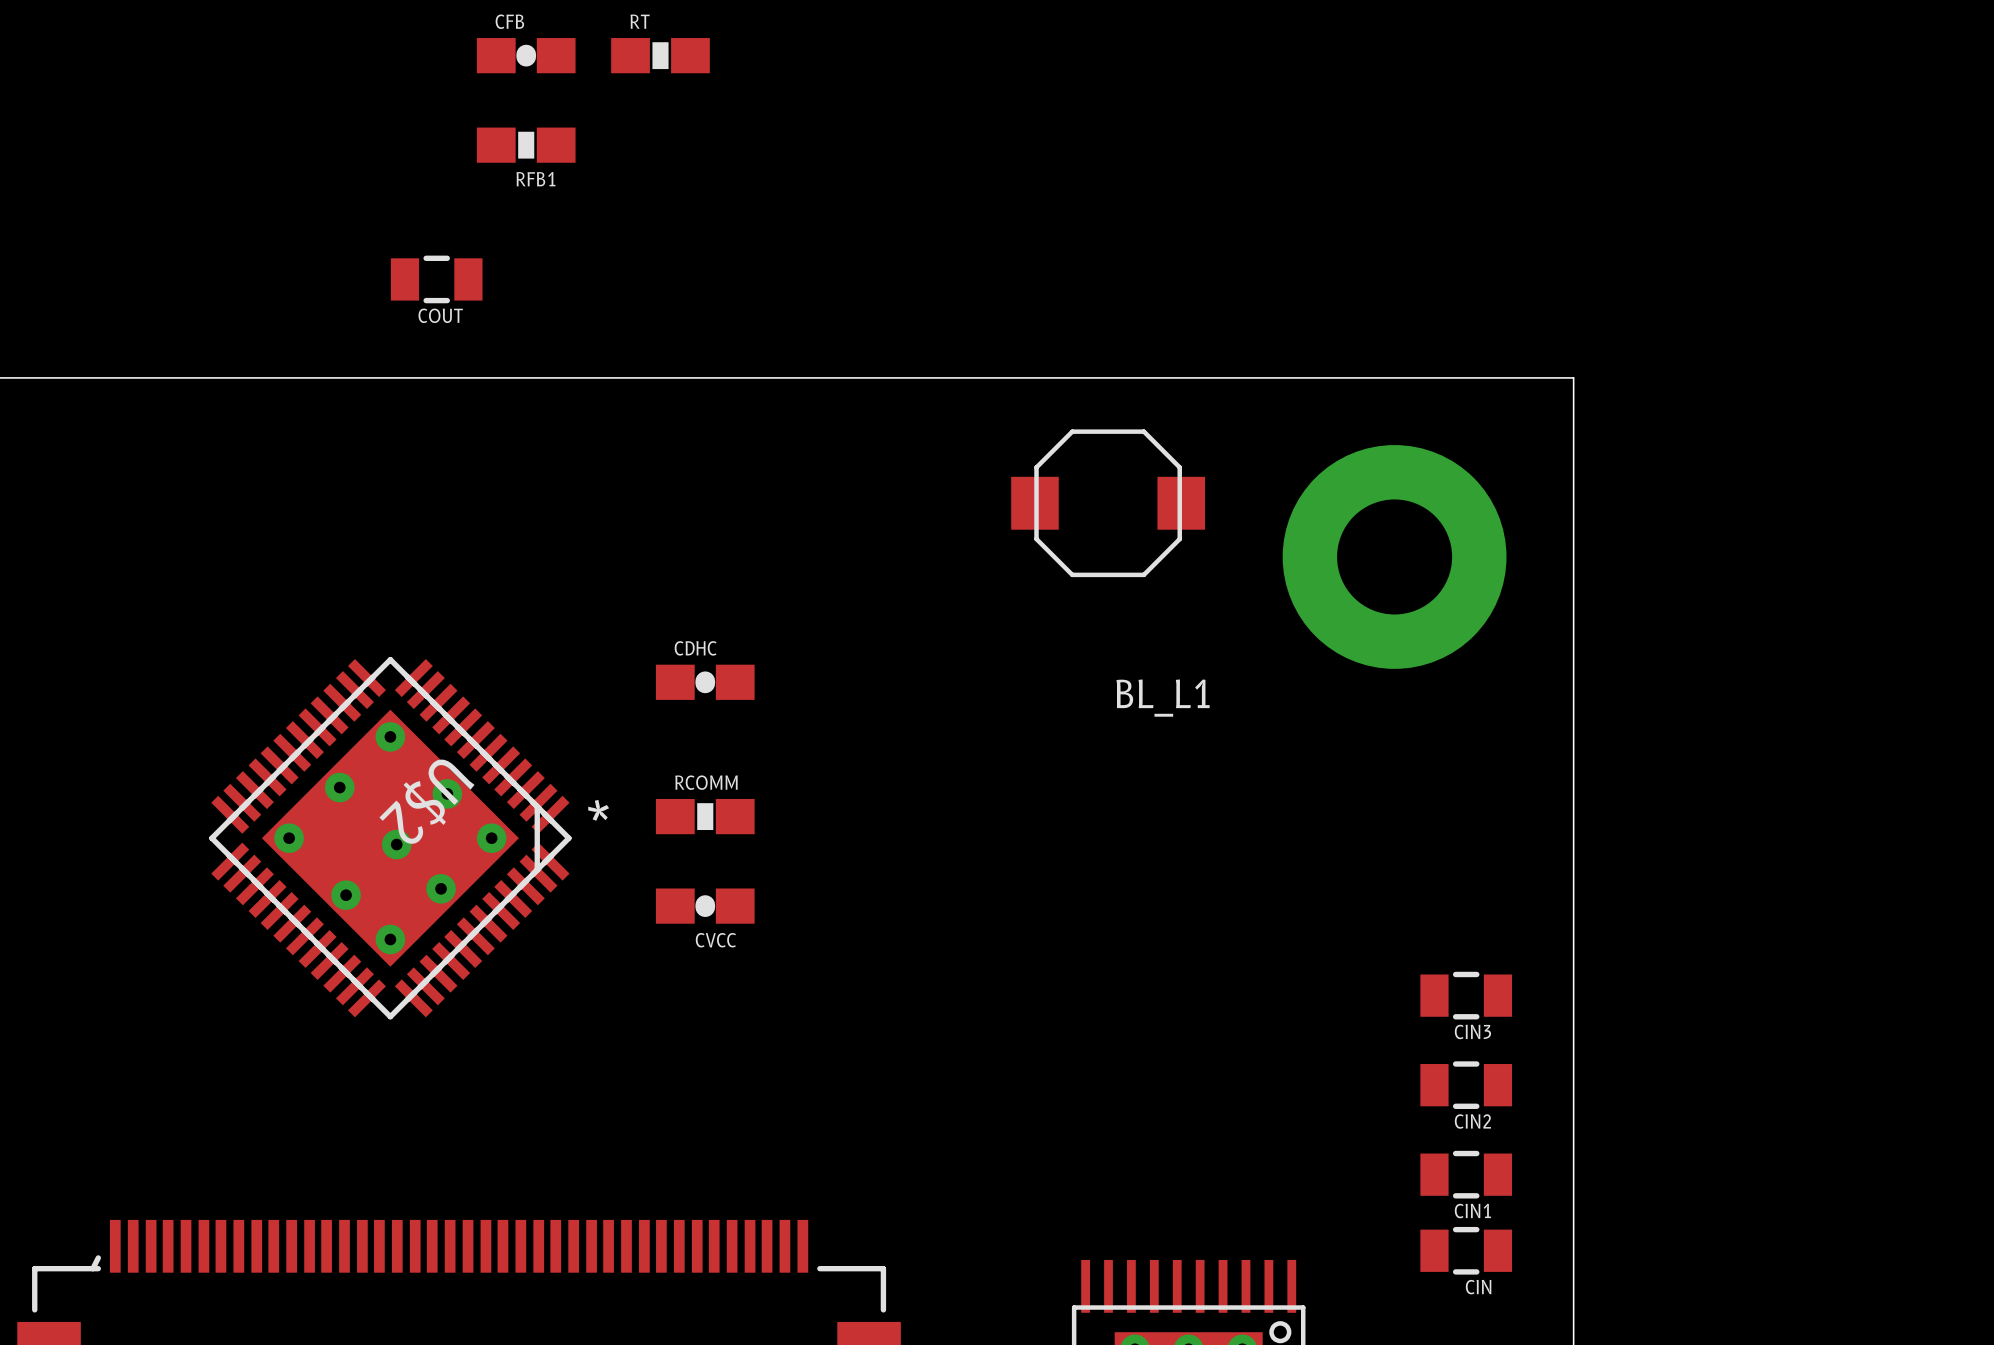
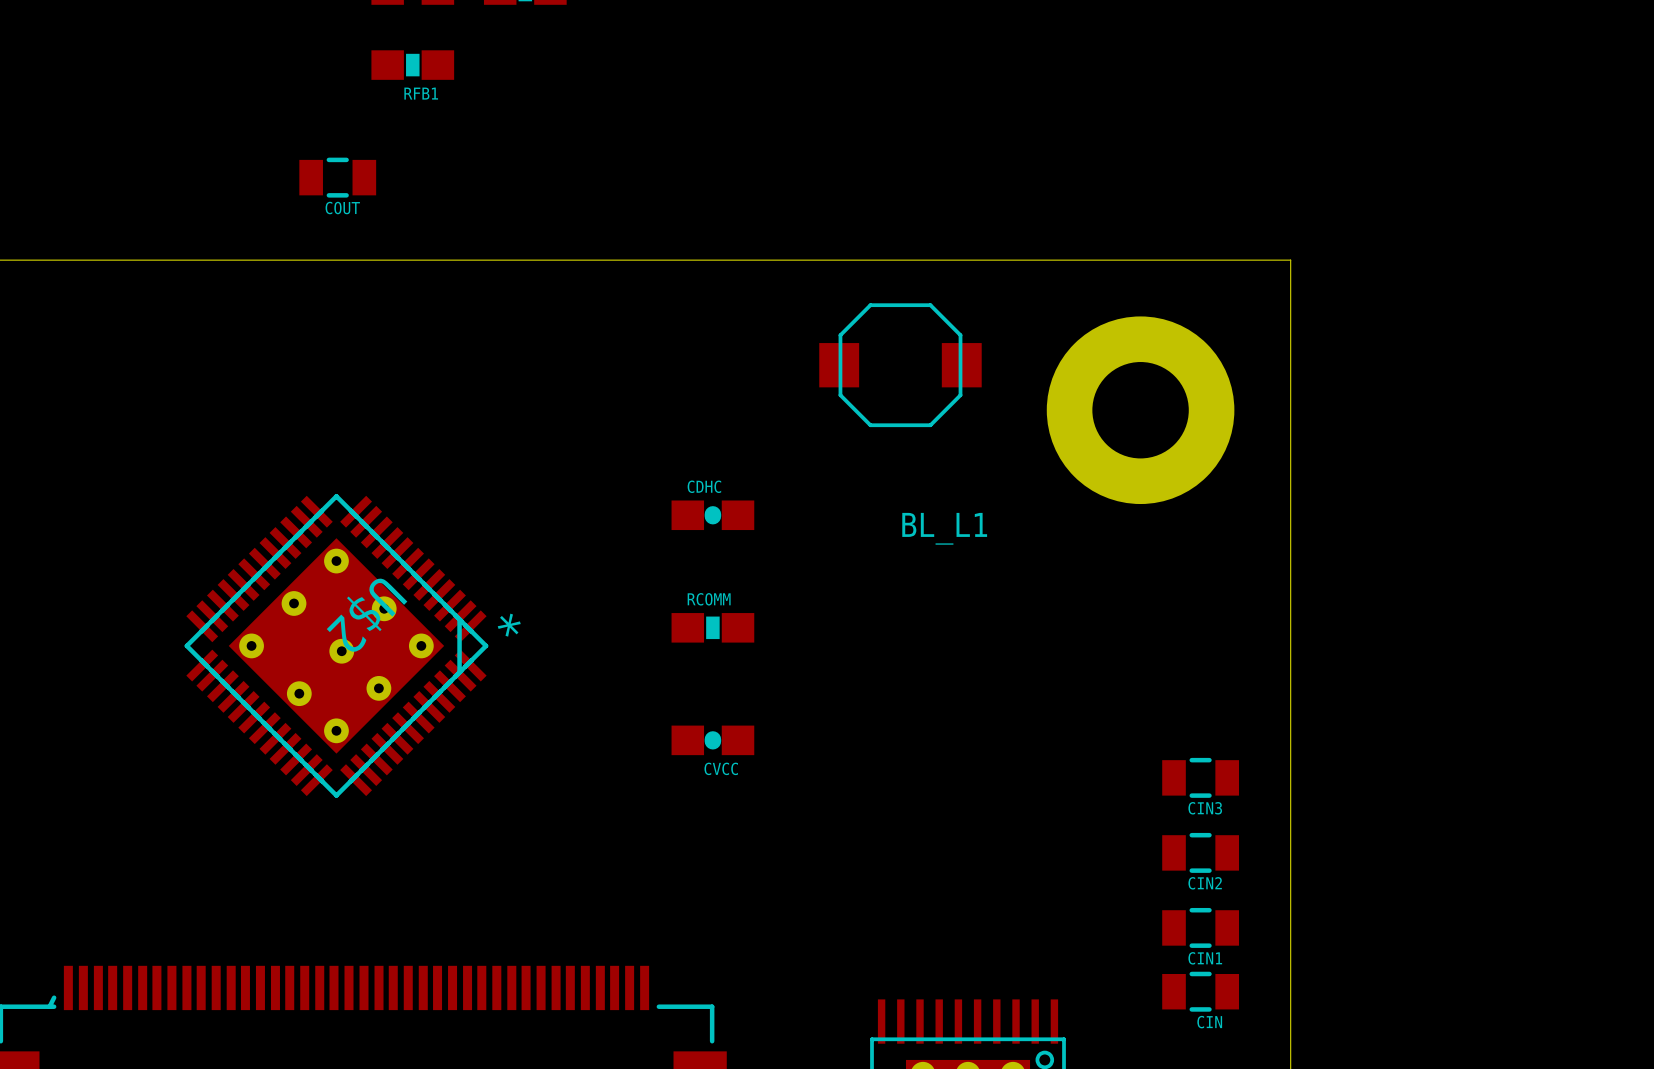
CDHC position: (705, 682) -> (712, 515)
RCOMM position: (705, 816) -> (712, 627)
U$2 position: (390, 838) -> (336, 645)
CVCC position: (705, 906) -> (712, 740)

